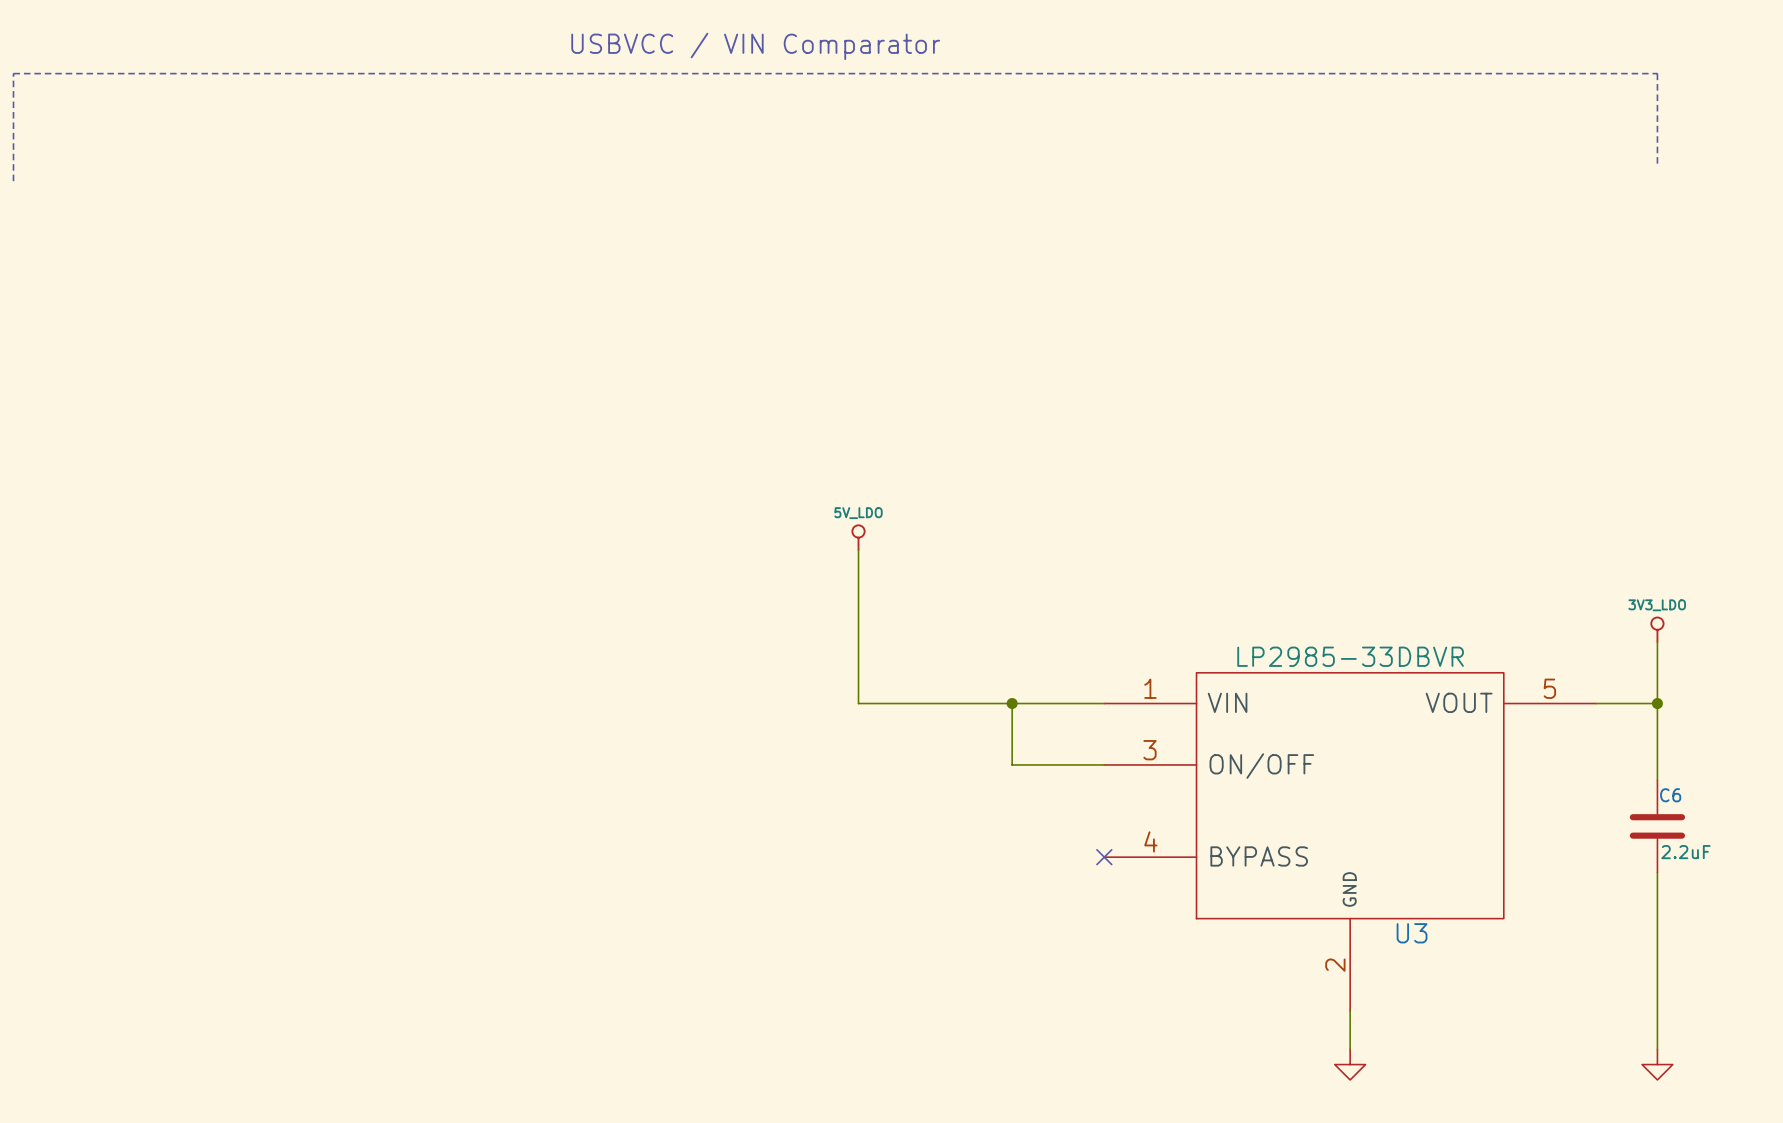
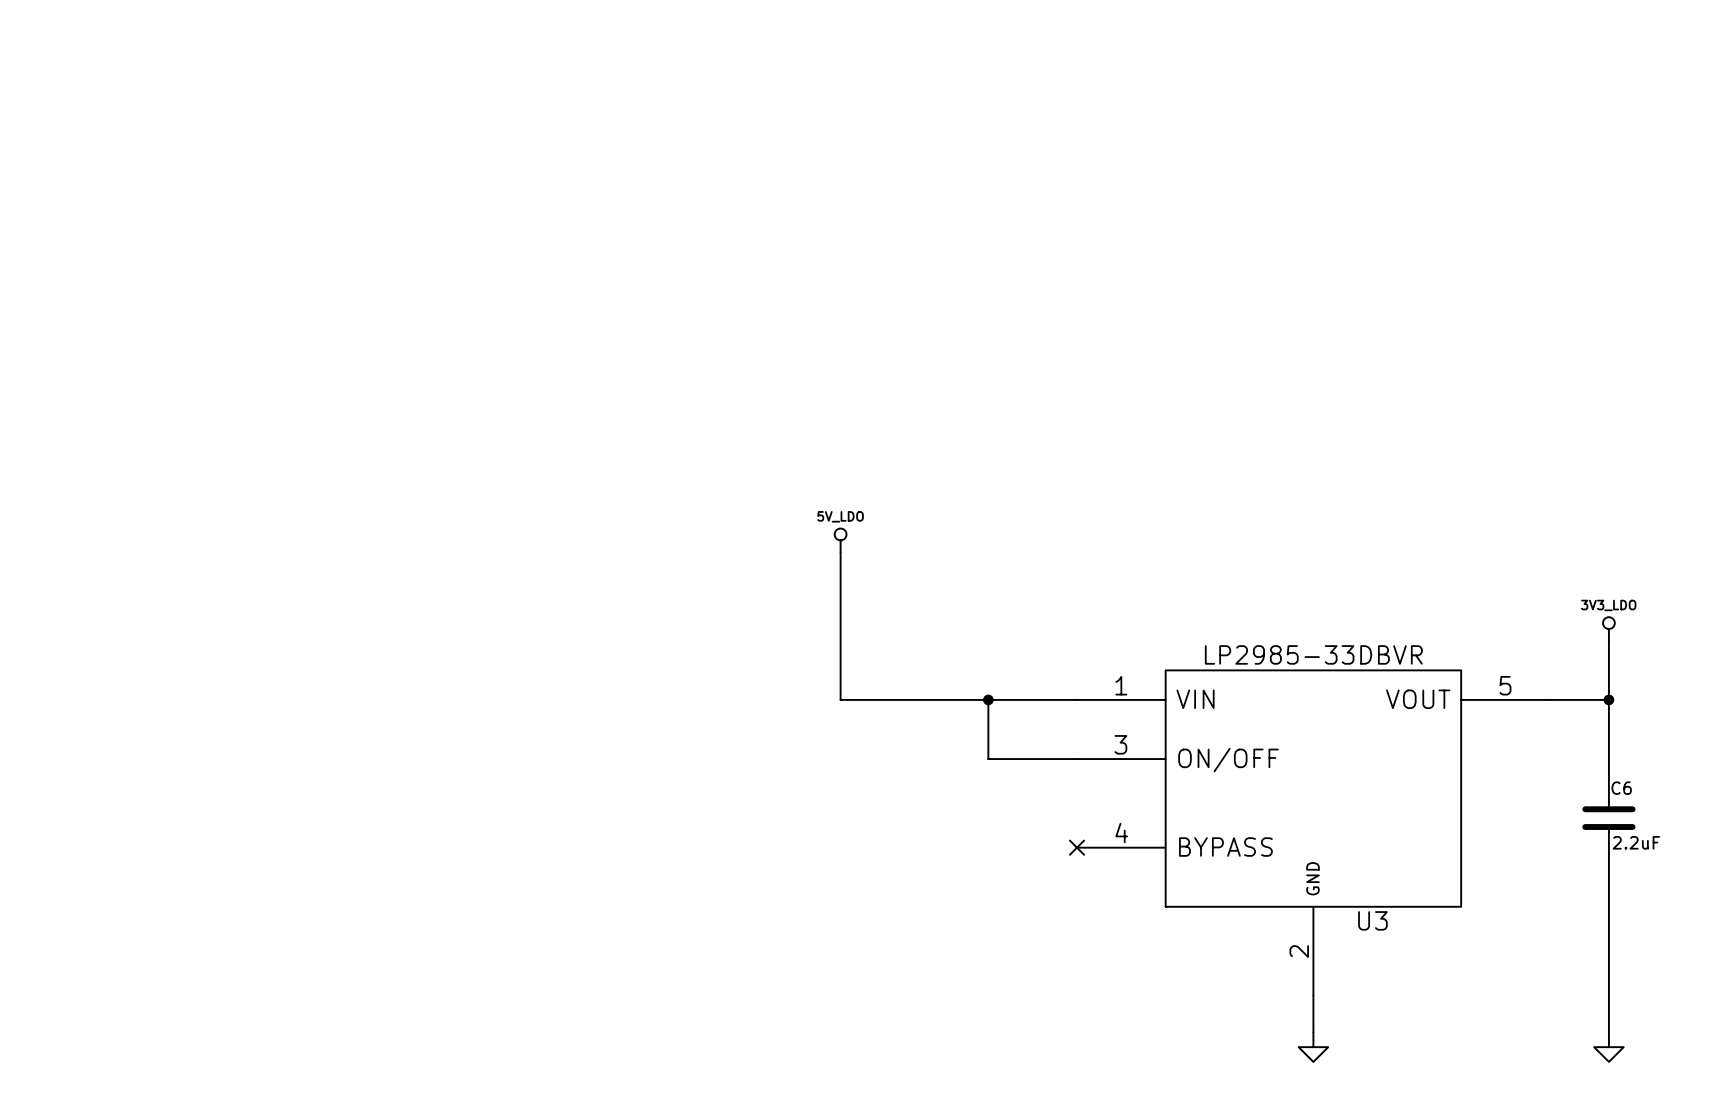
text: USBVCC / VIN Comparator (755, 46) -> none
line: (1657, 165) (1657, 73) (13, 73) (13, 181) -> none

